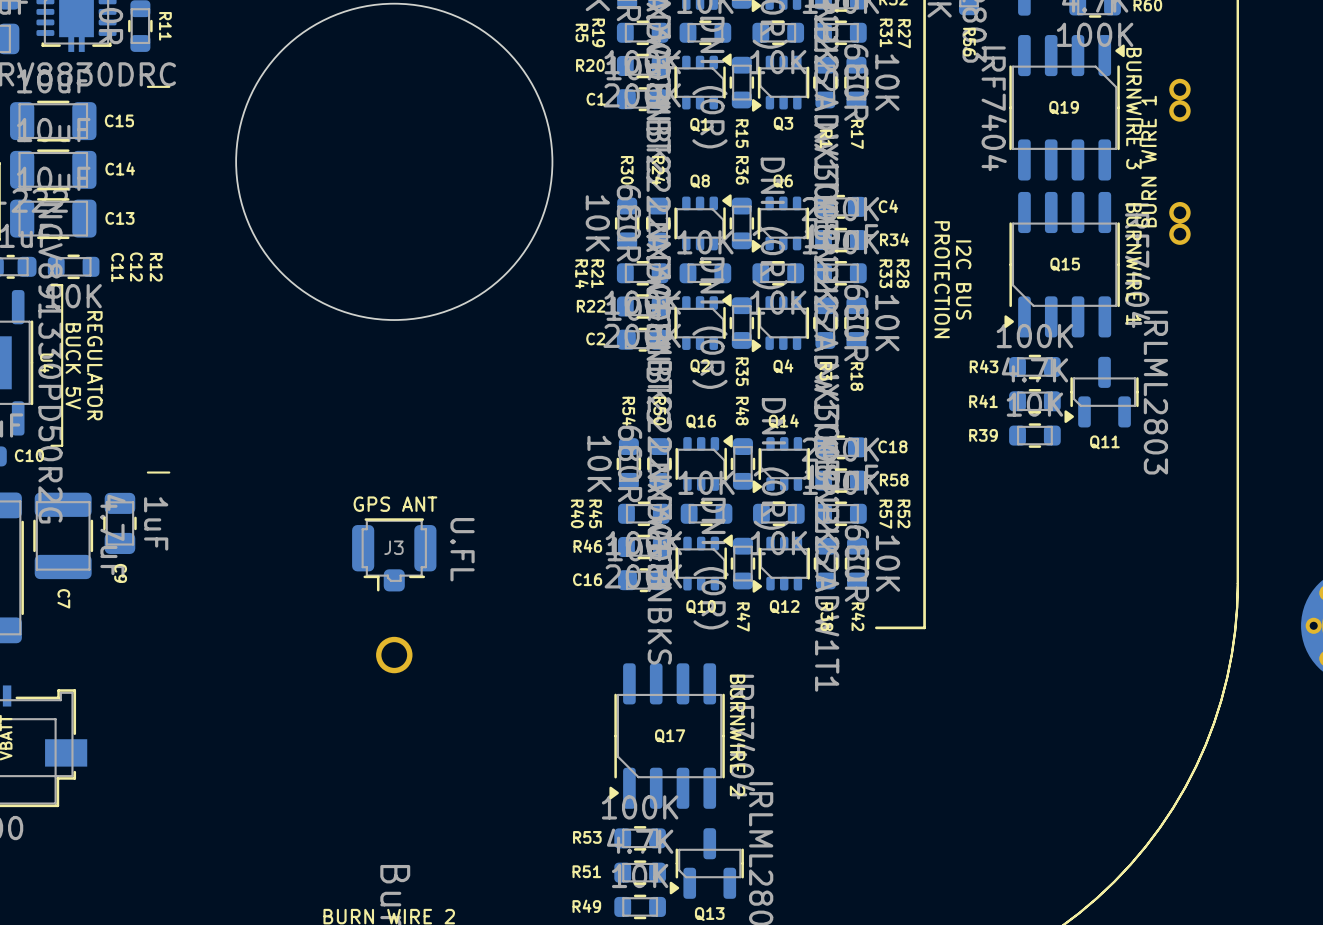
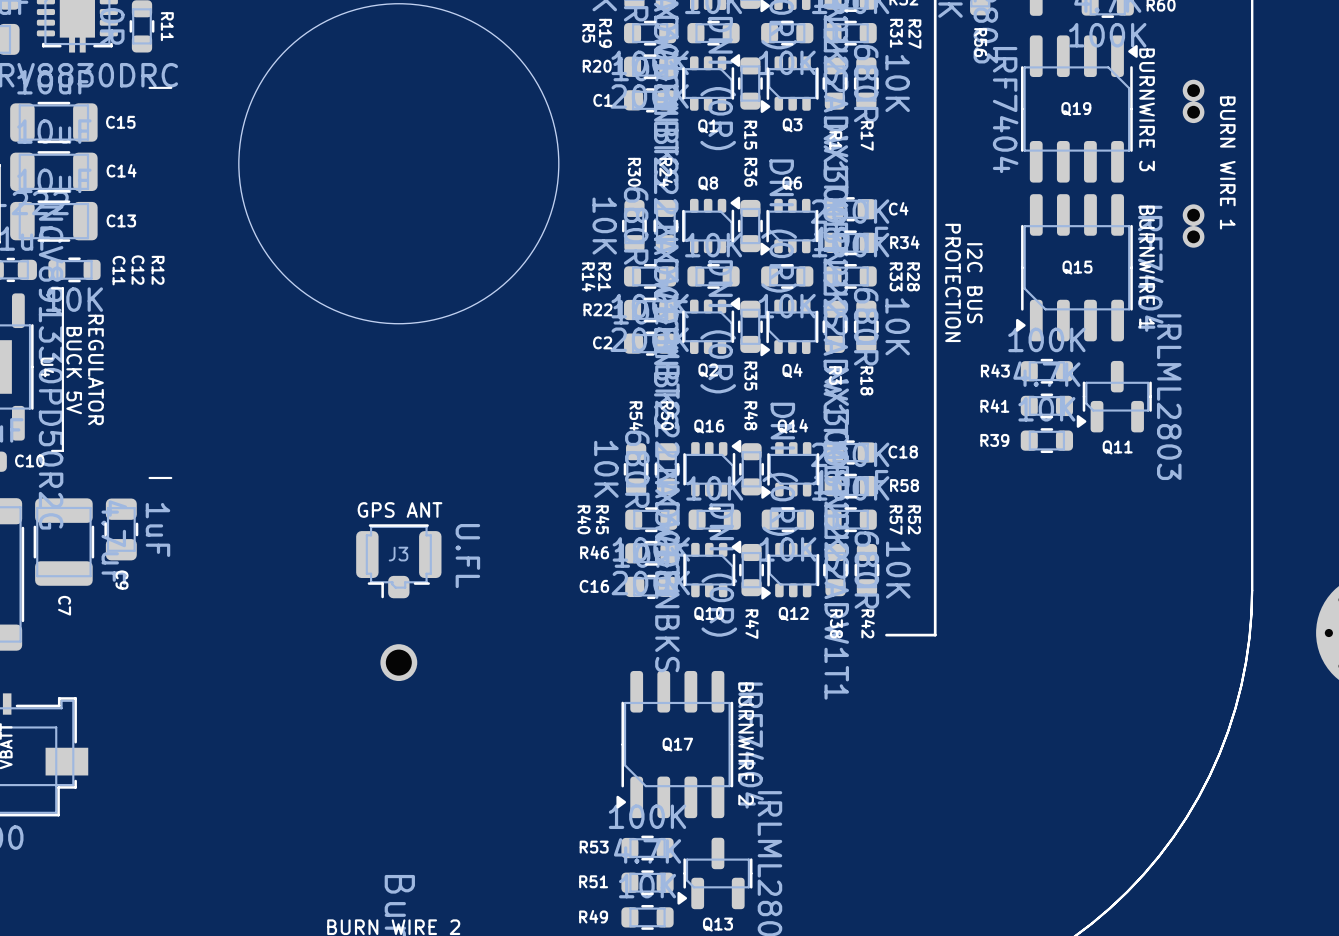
text rotation: 0° (1149, 161) -> 180° (1227, 162)

